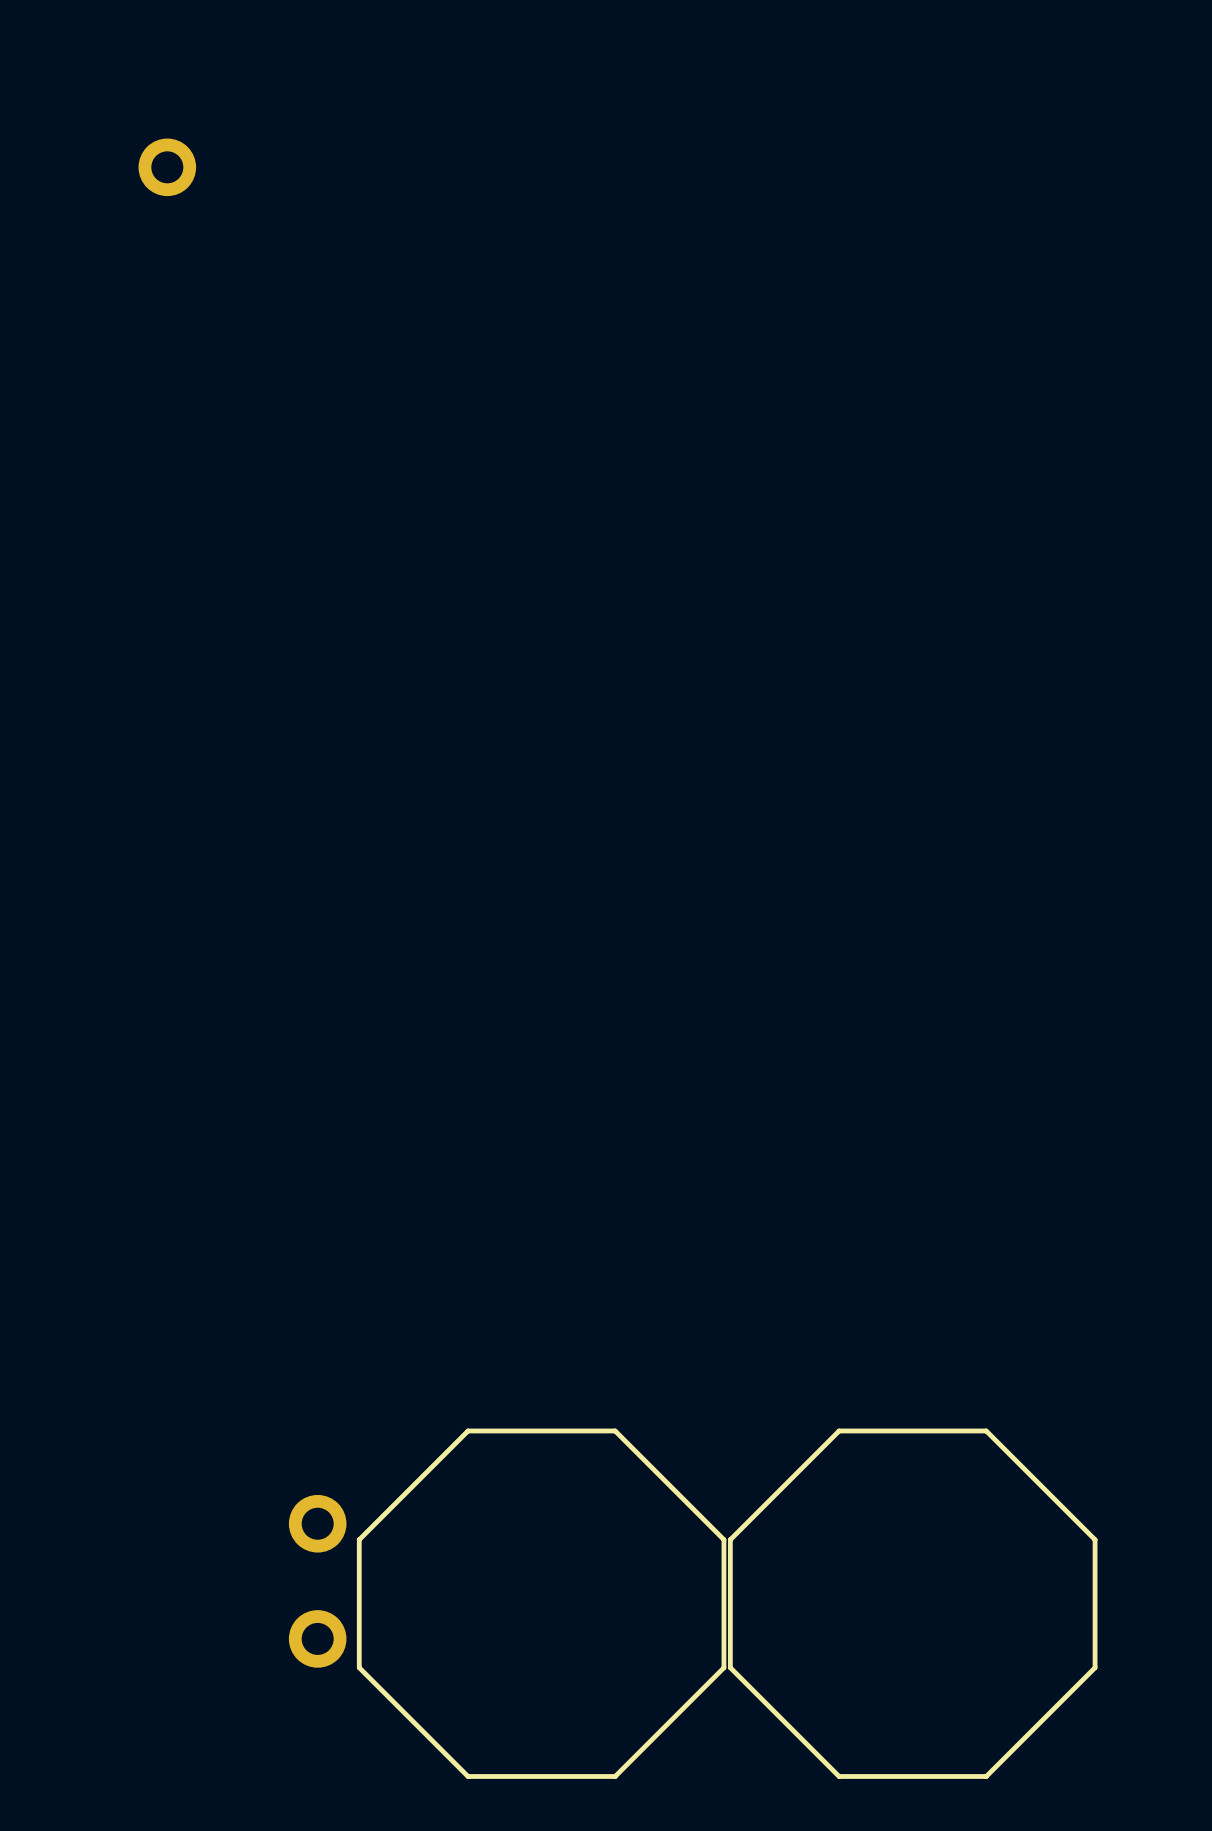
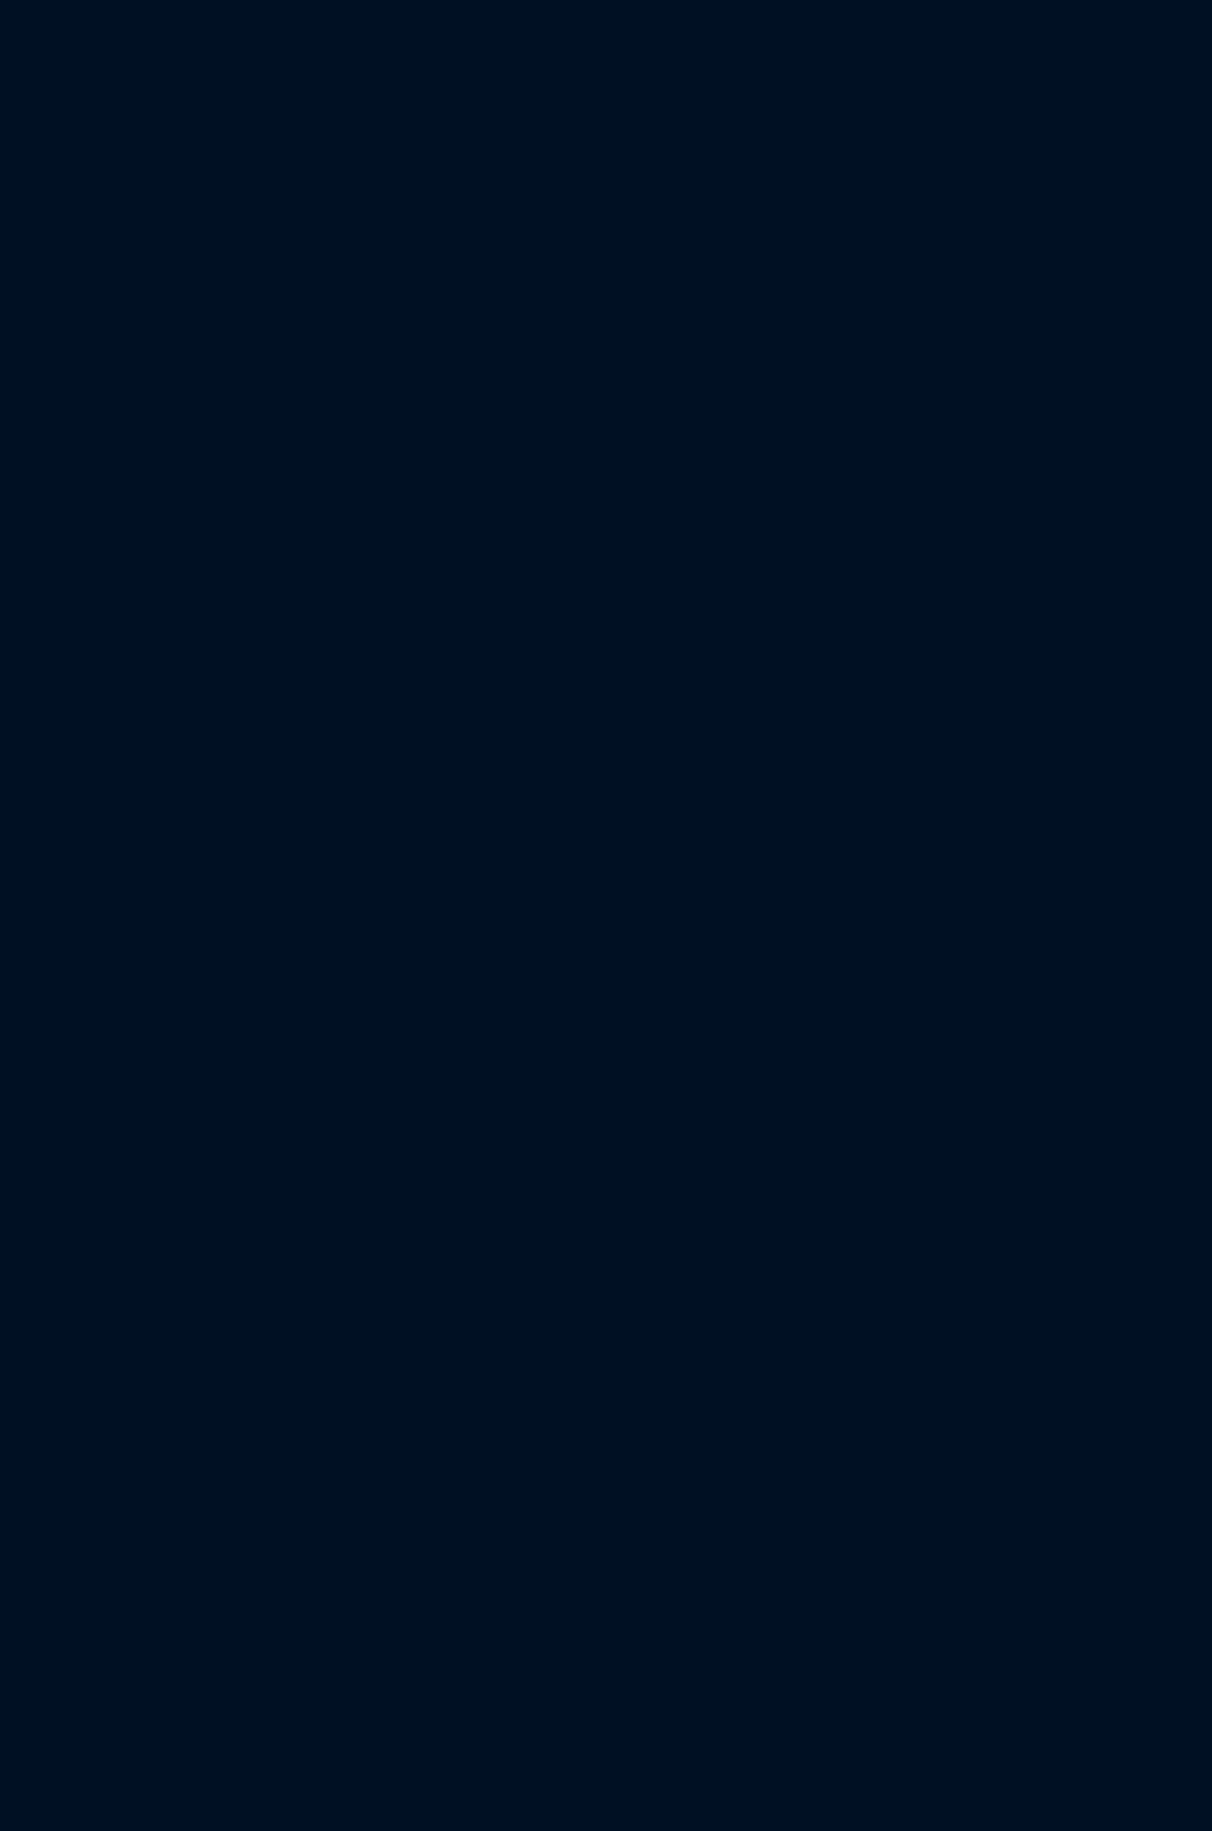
part: (167, 167) -> none
part: (317, 1523) -> none
part: (541, 1603) -> none
part: (912, 1603) -> none
part: (317, 1638) -> none

